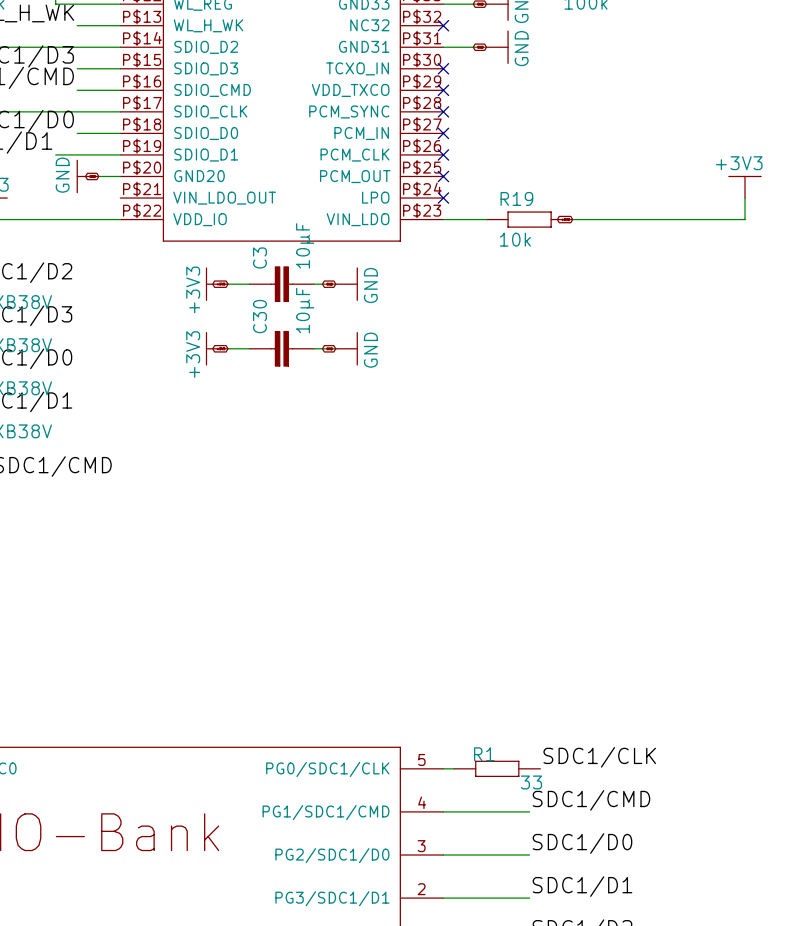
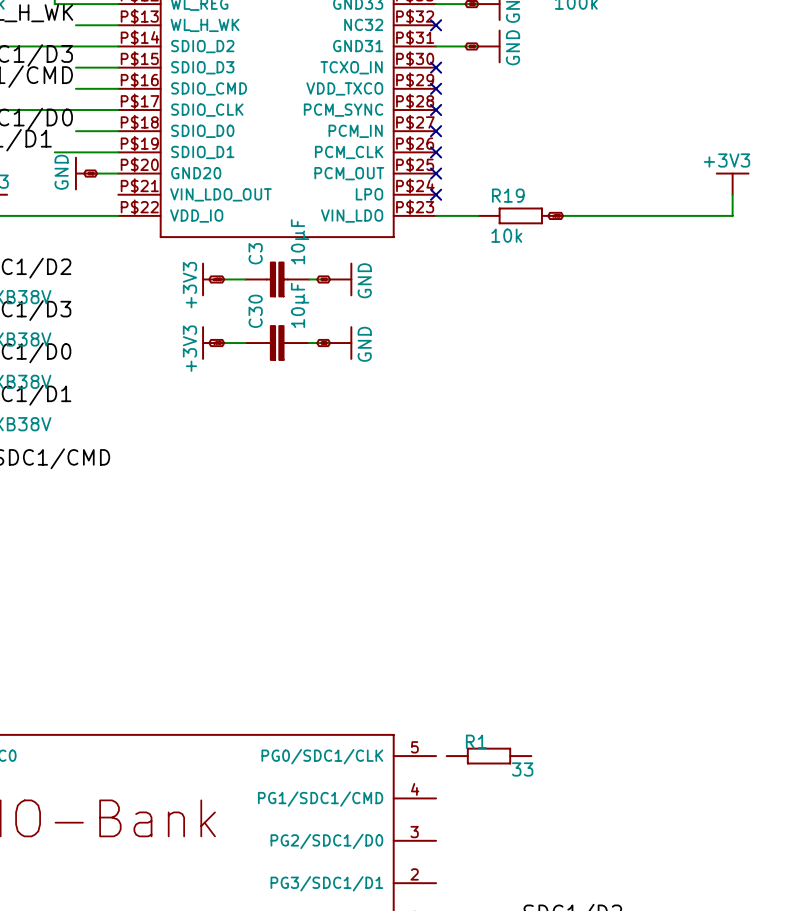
label: SDC1/CLK (599, 757) -> none
wire: (443, 768) (454, 768) -> none
label: SDC1/CMD (591, 800) -> none
wire: (443, 811) (529, 811) -> none
label: SDC1/D0 (582, 843) -> none
wire: (443, 855) (529, 855) -> none
label: SDC1/D1 (582, 886) -> none
wire: (443, 898) (529, 898) -> none

